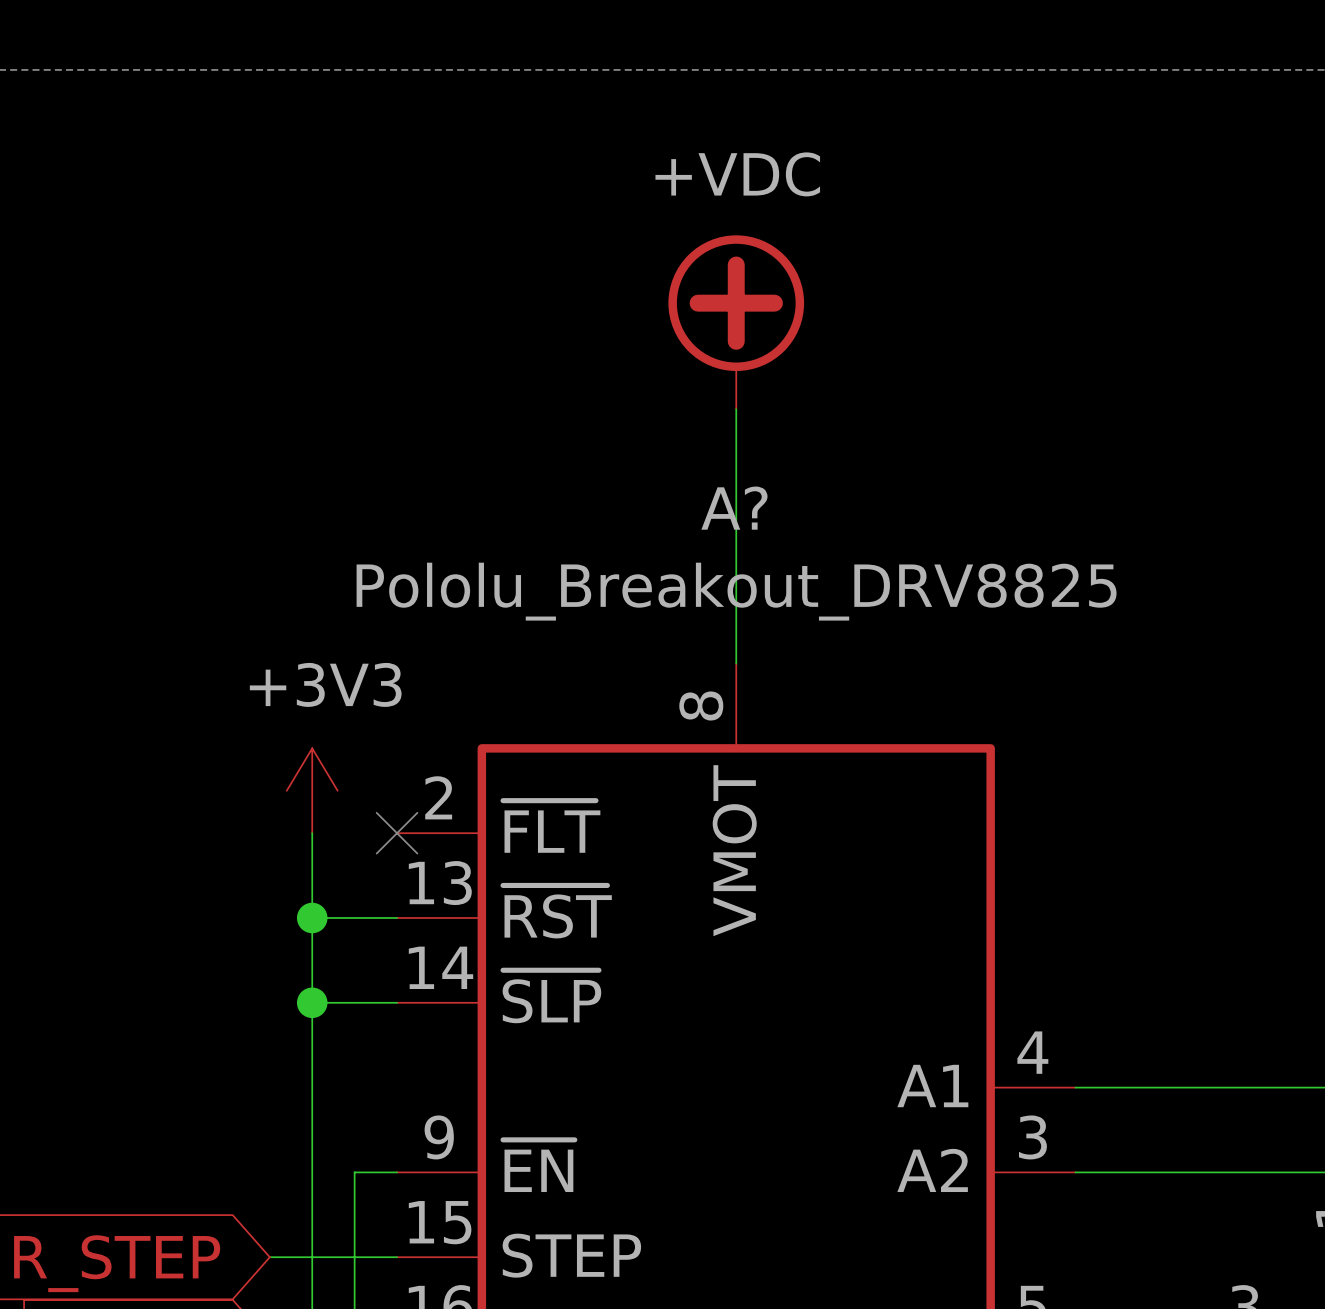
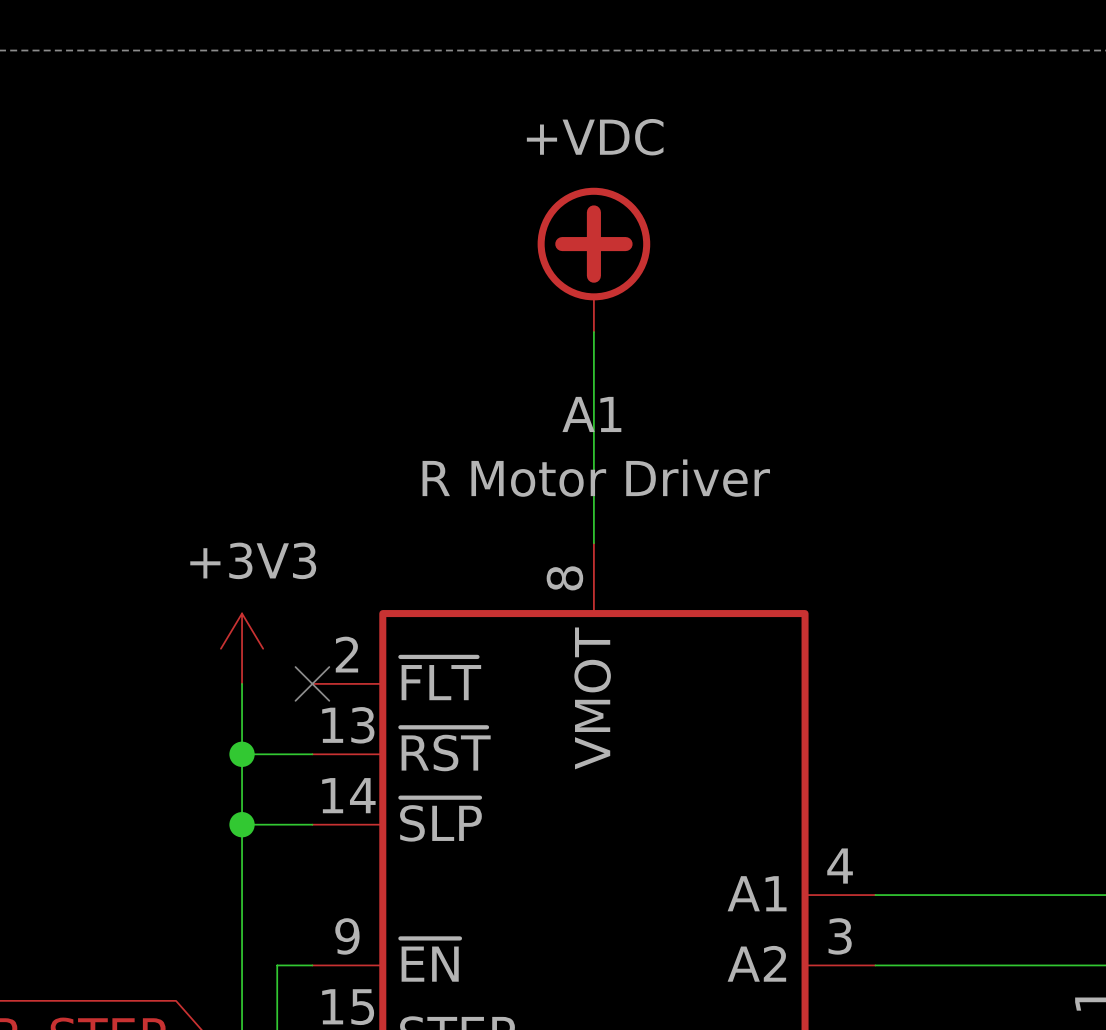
A? name: A? (734, 508) -> A1 (591, 414)
A? value: Pololu_Breakout_DRV8825 (736, 591) -> R Motor Driver (596, 478)

